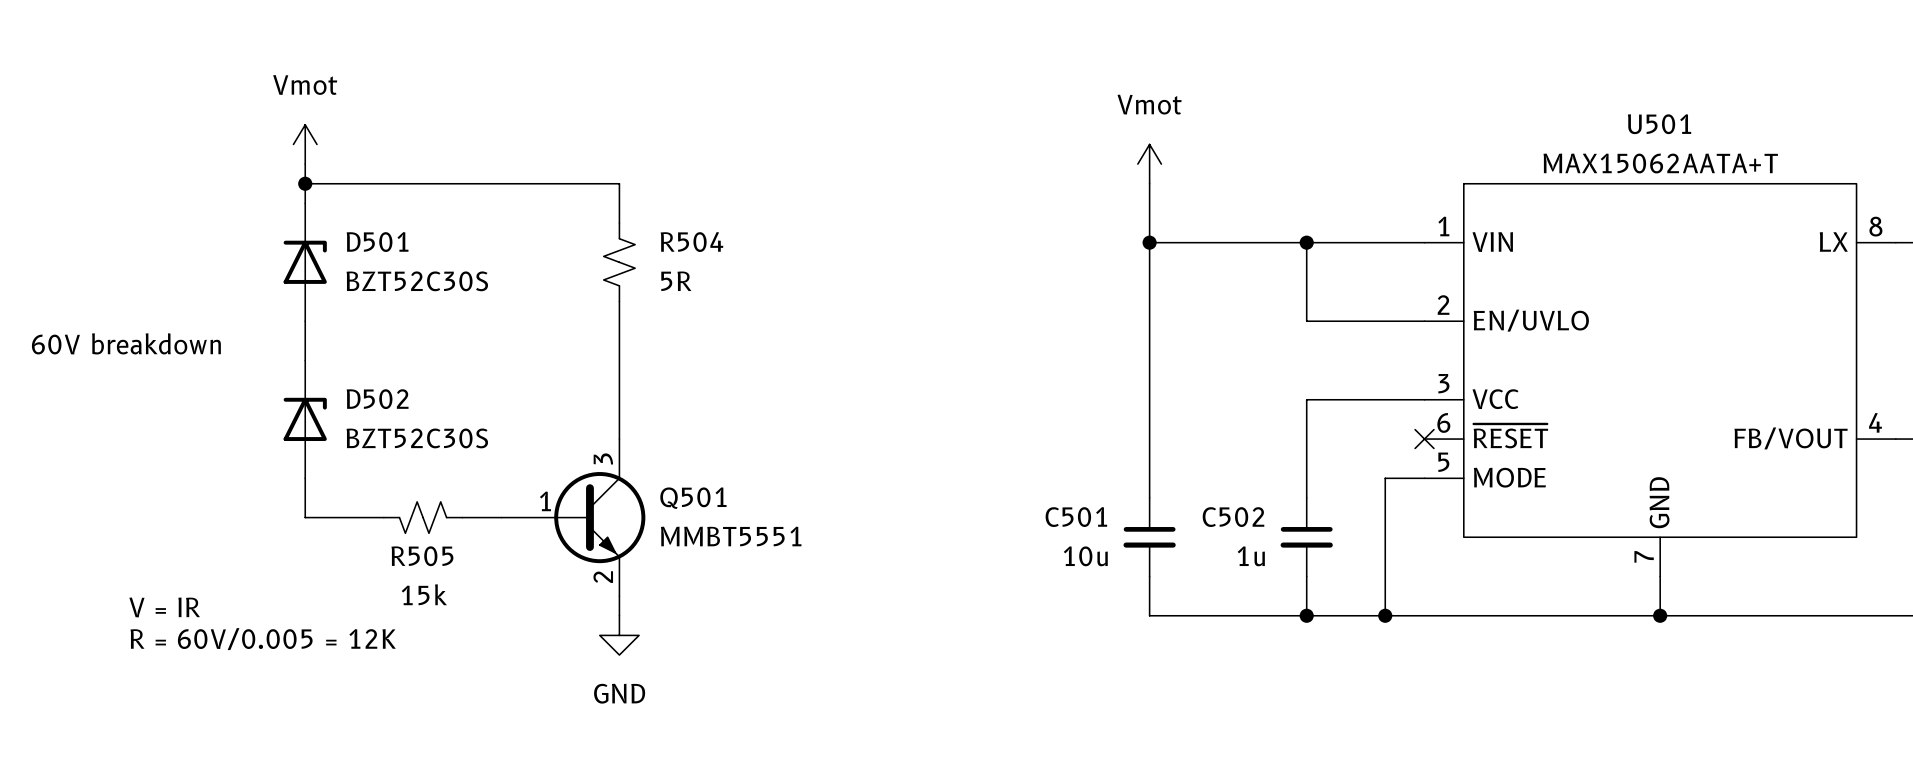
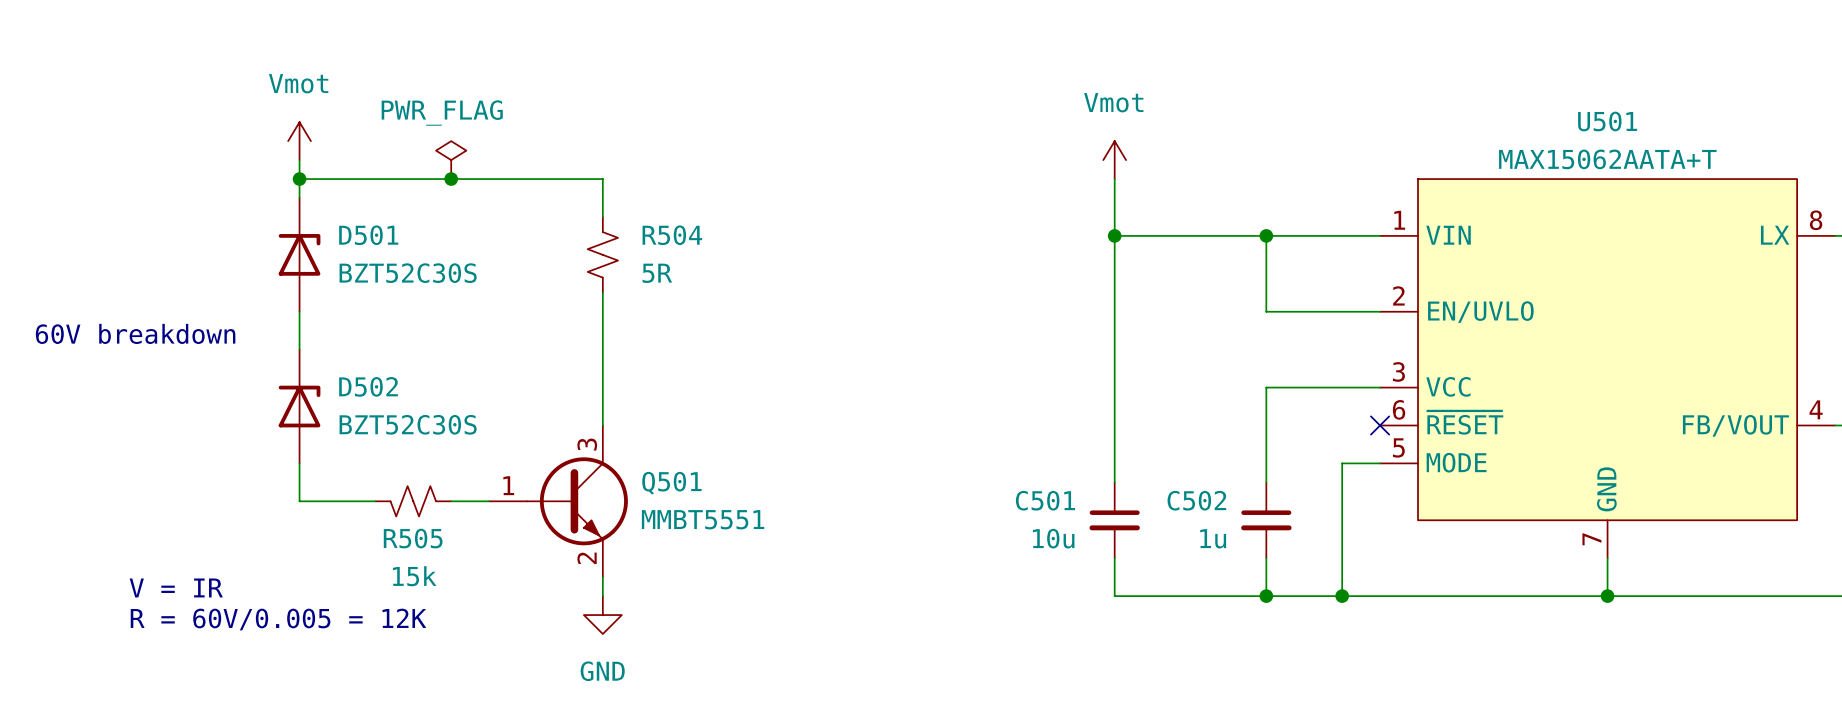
power symbol: none -> PWR_FLAG (451, 160)
junction: none -> (451, 179)
Q501 symbol: [501, 439, 646, 597] -> [489, 425, 628, 578]

